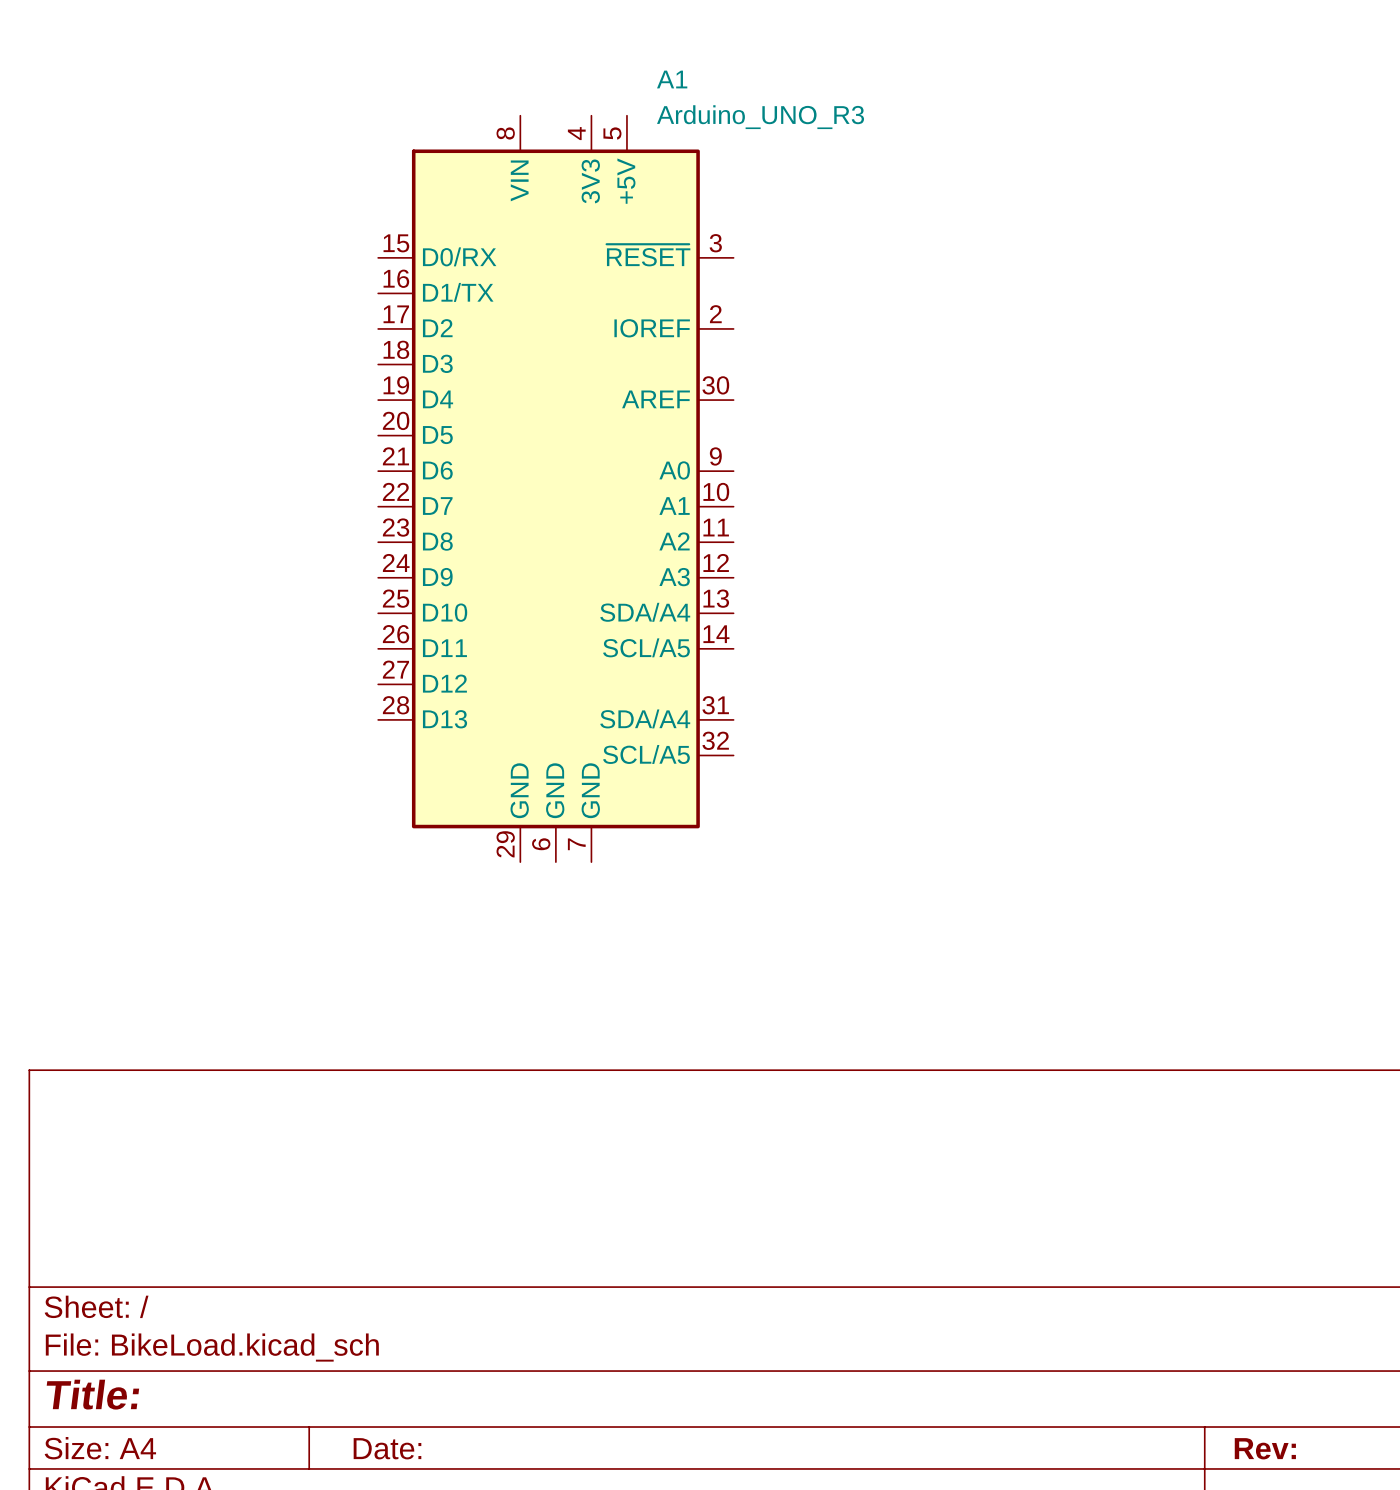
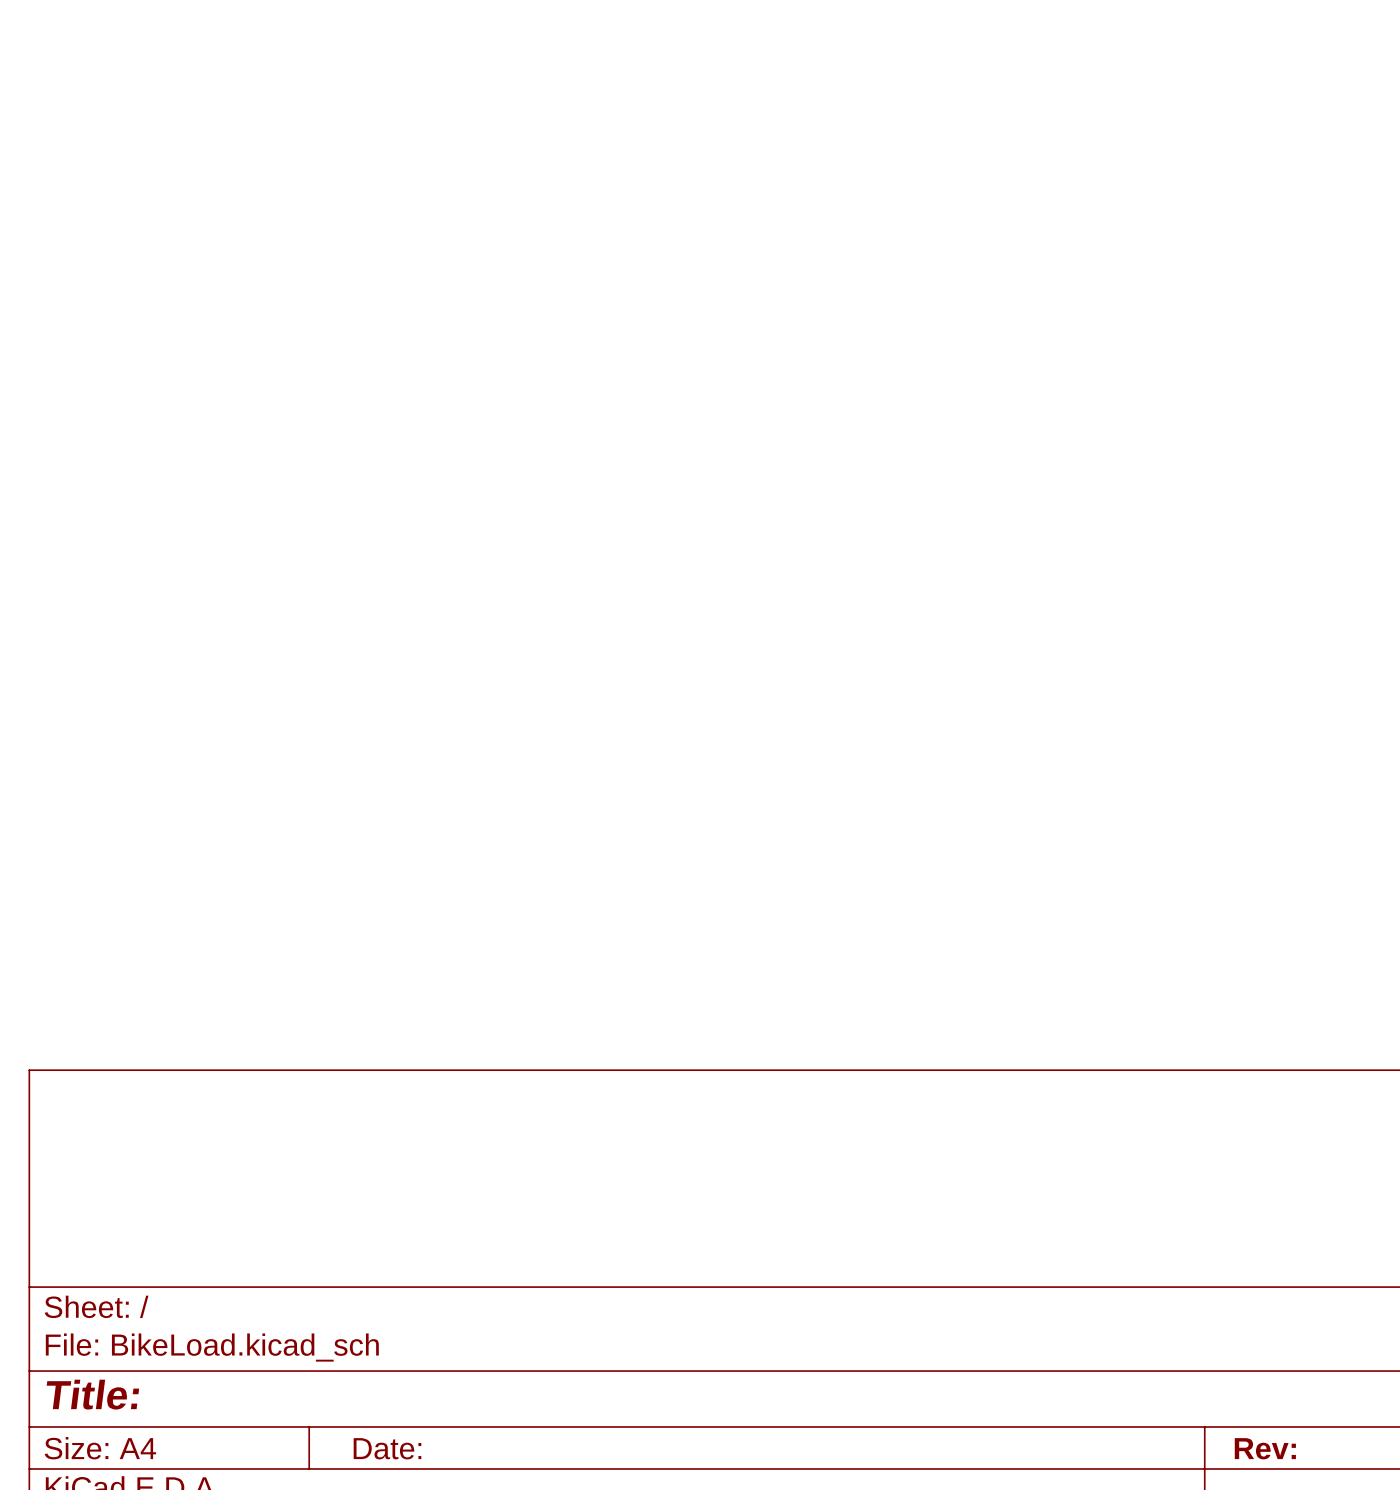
A1: Arduino_UNO_R3 (555, 488) -> none

